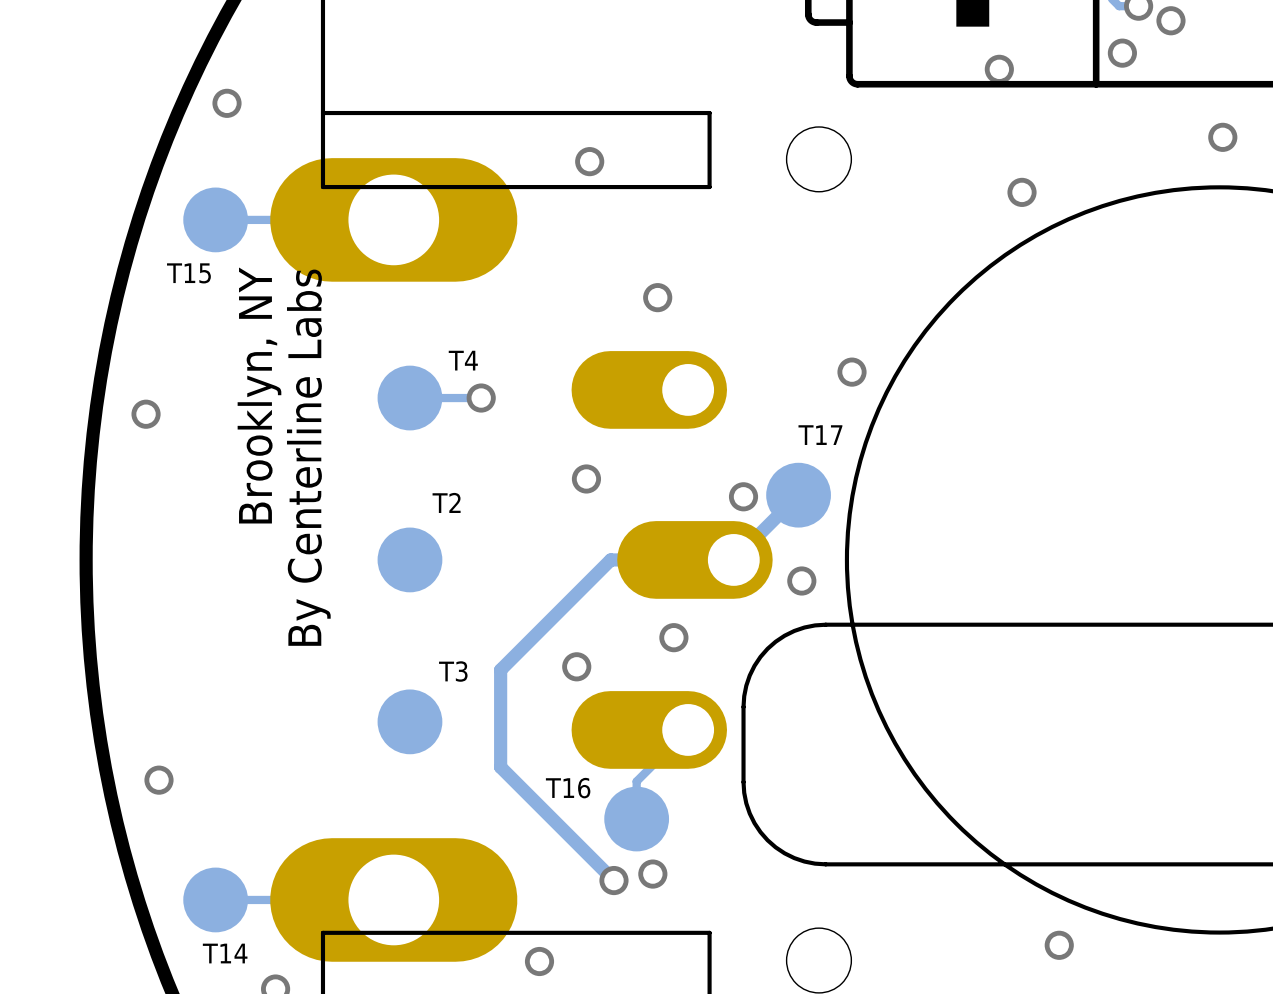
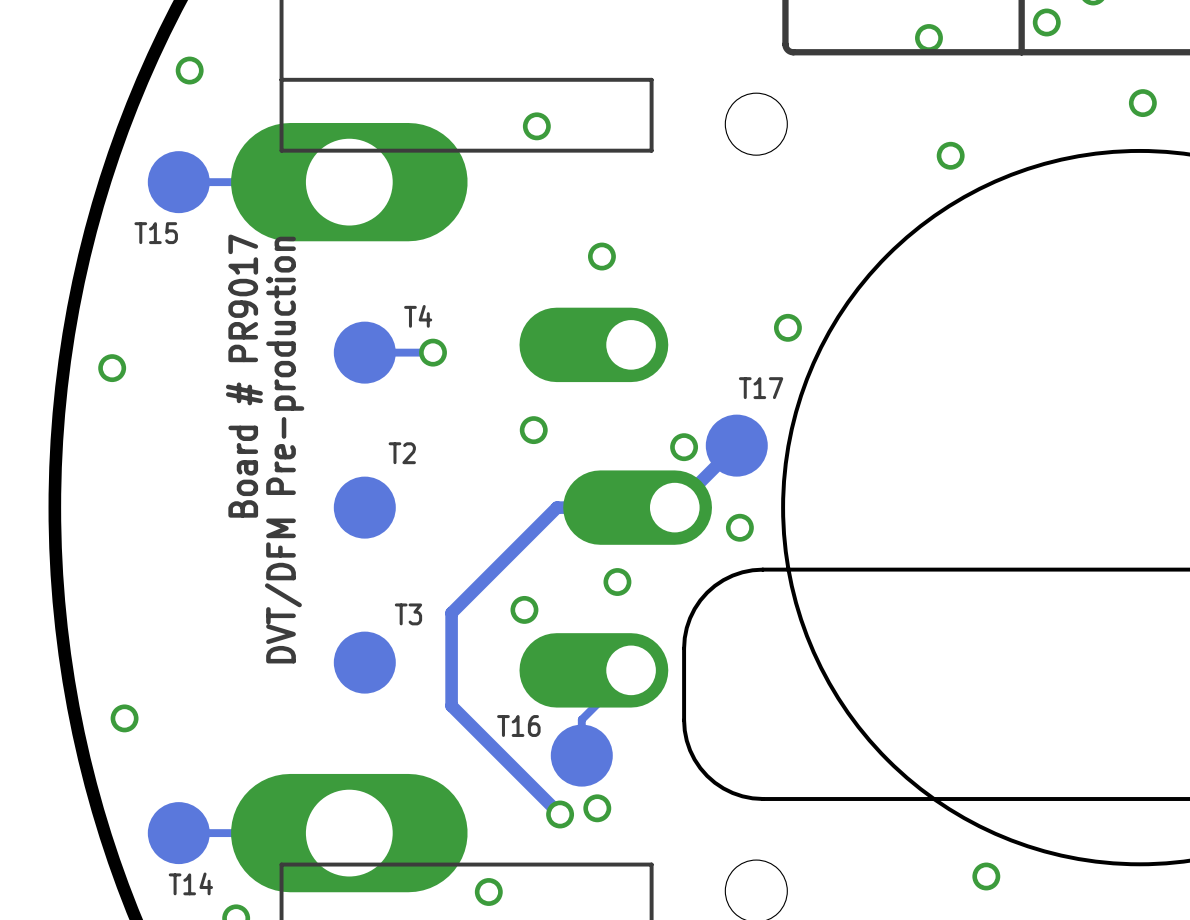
text: Brooklyn, NY (259, 395) -> none
text: none -> Board # PR9017 (244, 376)
text: By Centerline Labs (308, 457) -> none
text: none -> DVT/DFM Pre-production (284, 450)

